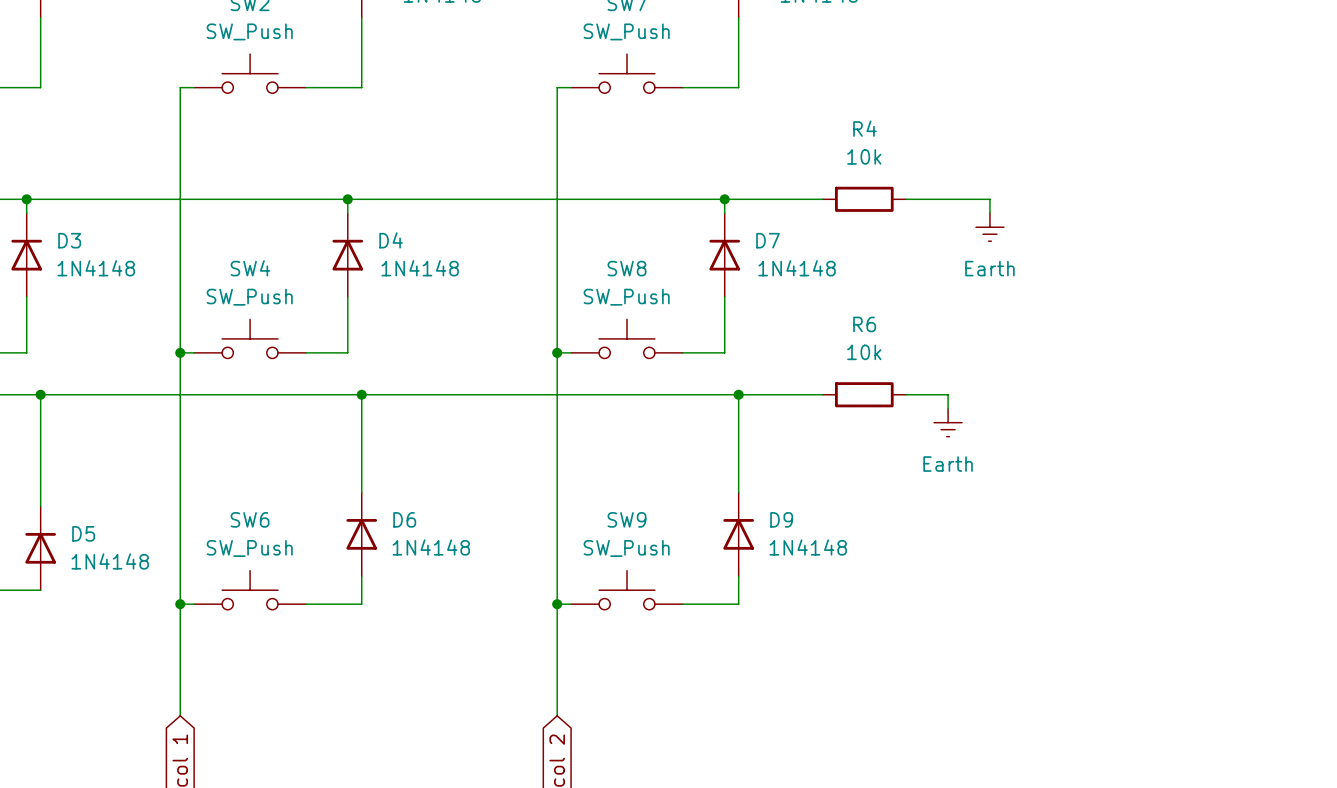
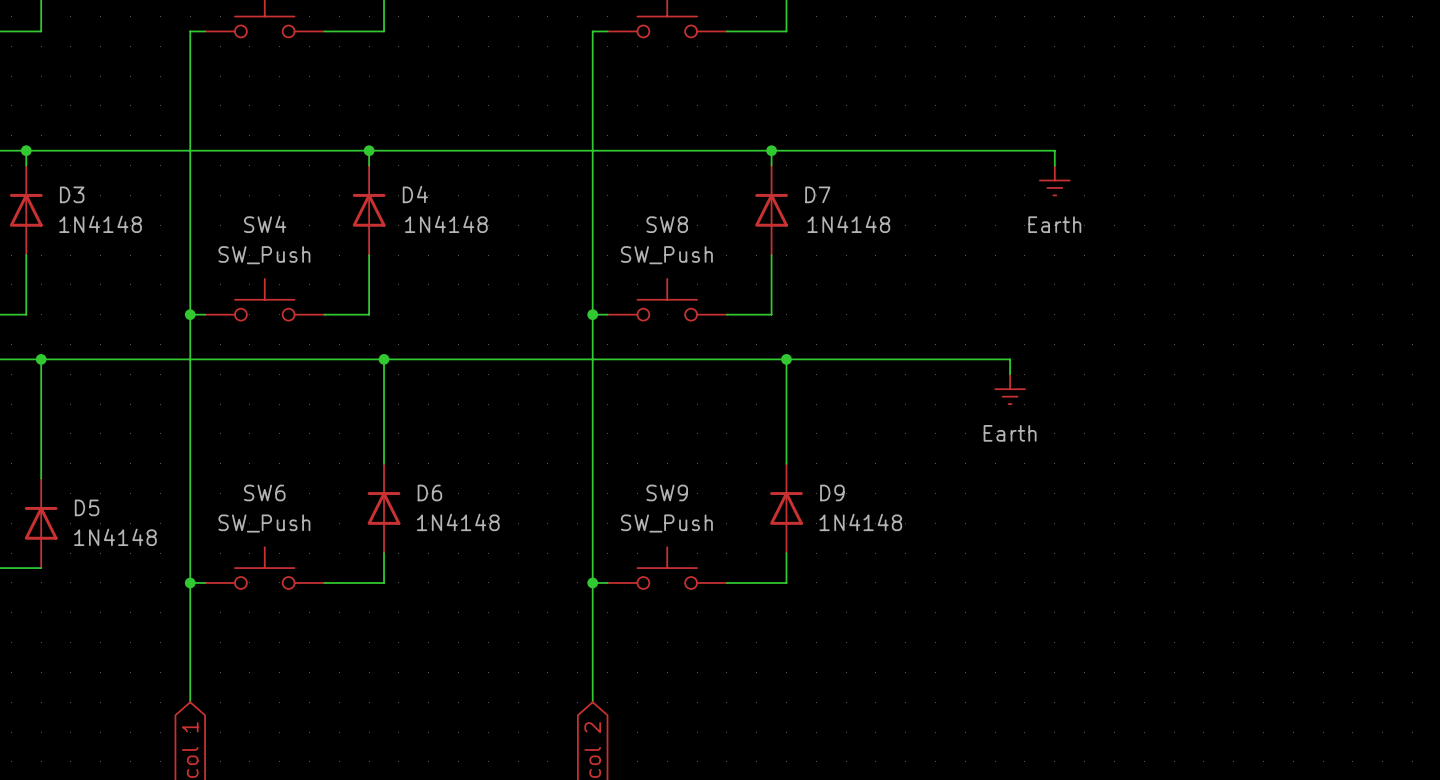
wire: none -> (875, 150) (965, 150)
R4: 10k (864, 199) -> none
wire: none -> (875, 359) (965, 359)
R6: 10k (864, 394) -> none

